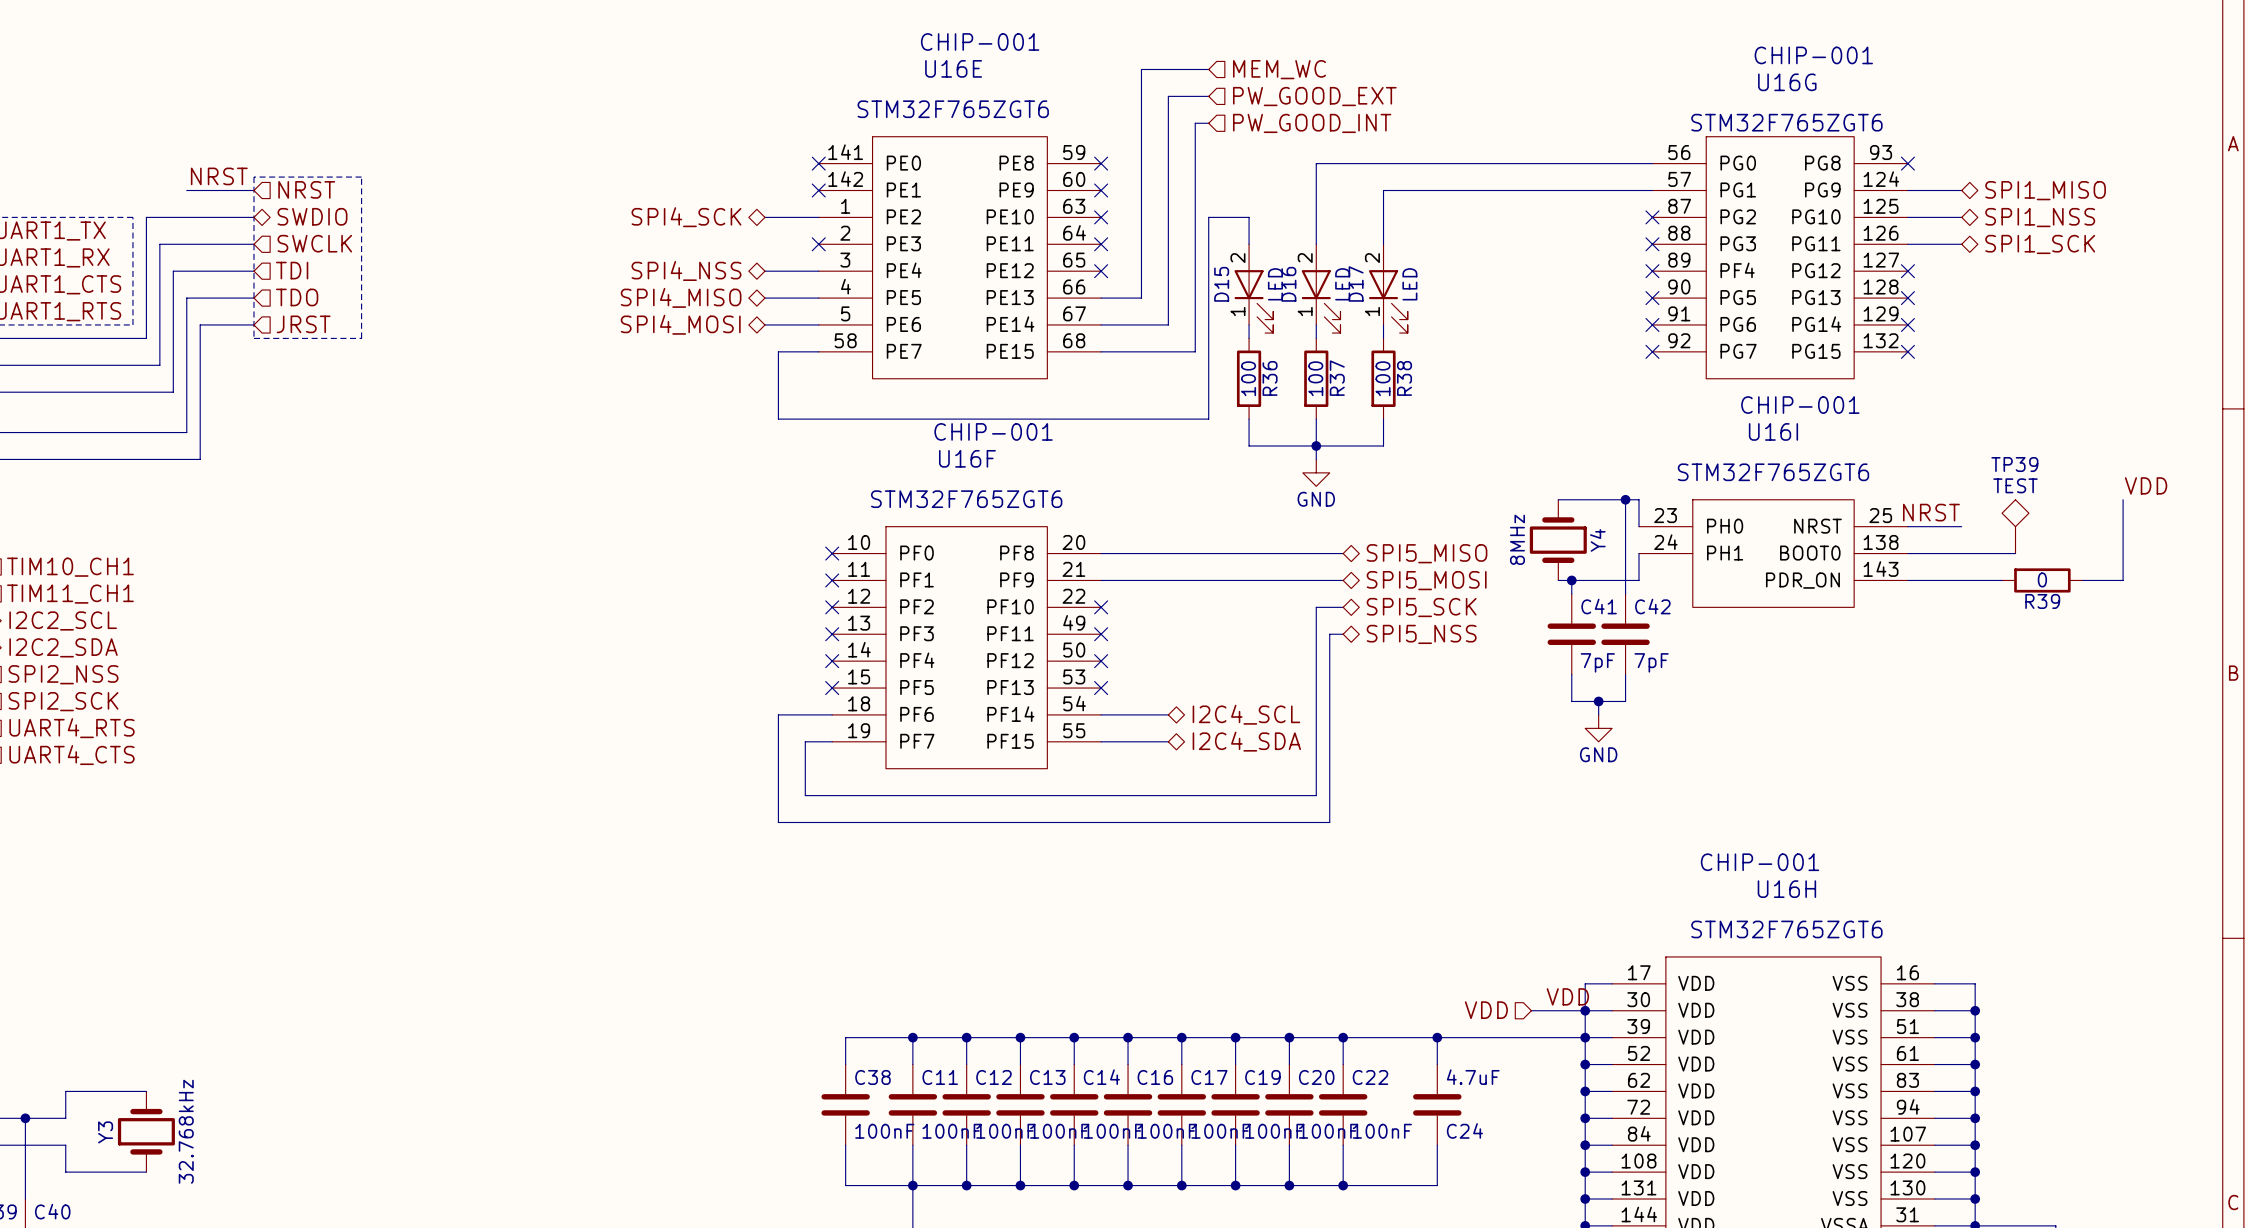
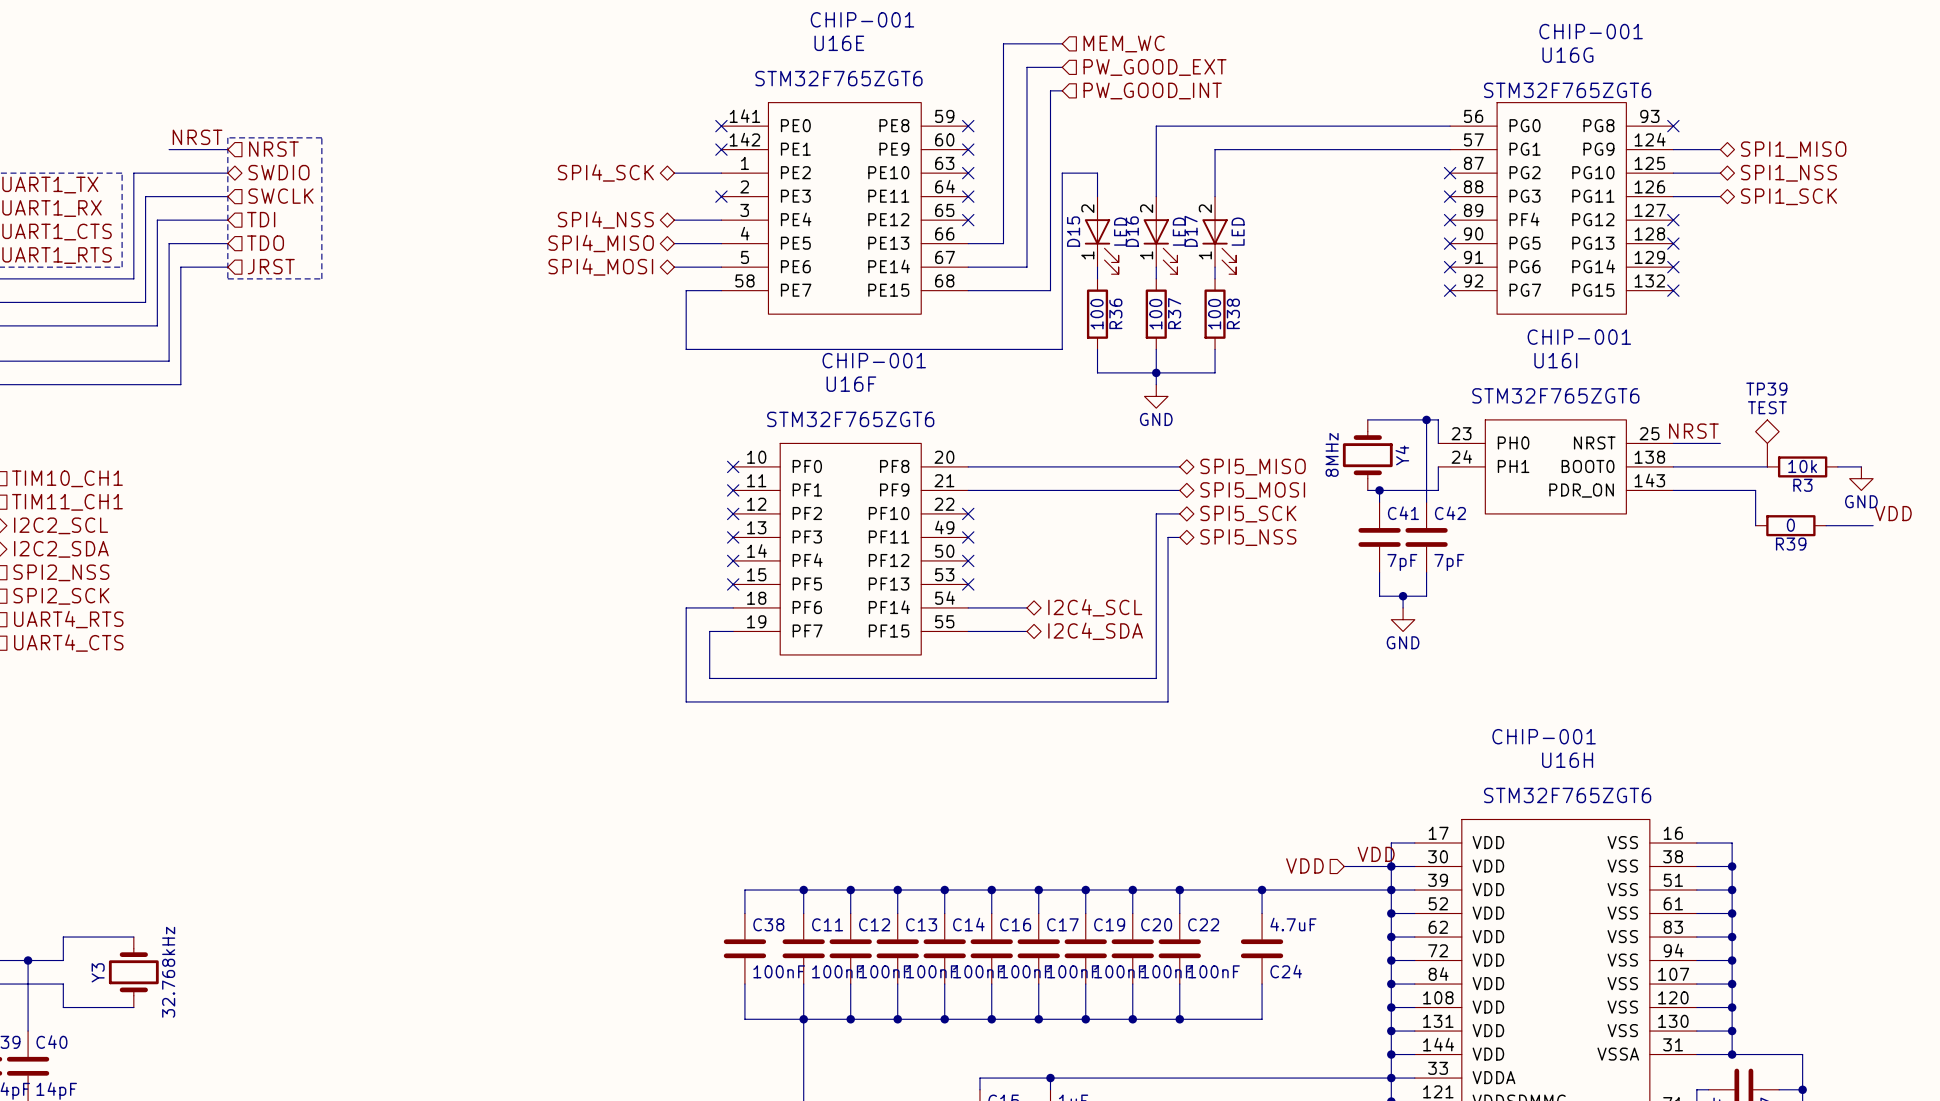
label position: VDD (2146, 485) -> VDD (1893, 513)
wire: (2123, 499) (2123, 580) (2082, 580) -> none
R3: none -> 10k (1802, 466)
wire: none -> (1837, 466) (1861, 466)
power symbol: none -> GND (1861, 478)
wire: none -> (1755, 490) (1755, 525)
R39 position: (2042, 580) -> (1790, 525)
wire: none -> (1826, 525) (1873, 525)

